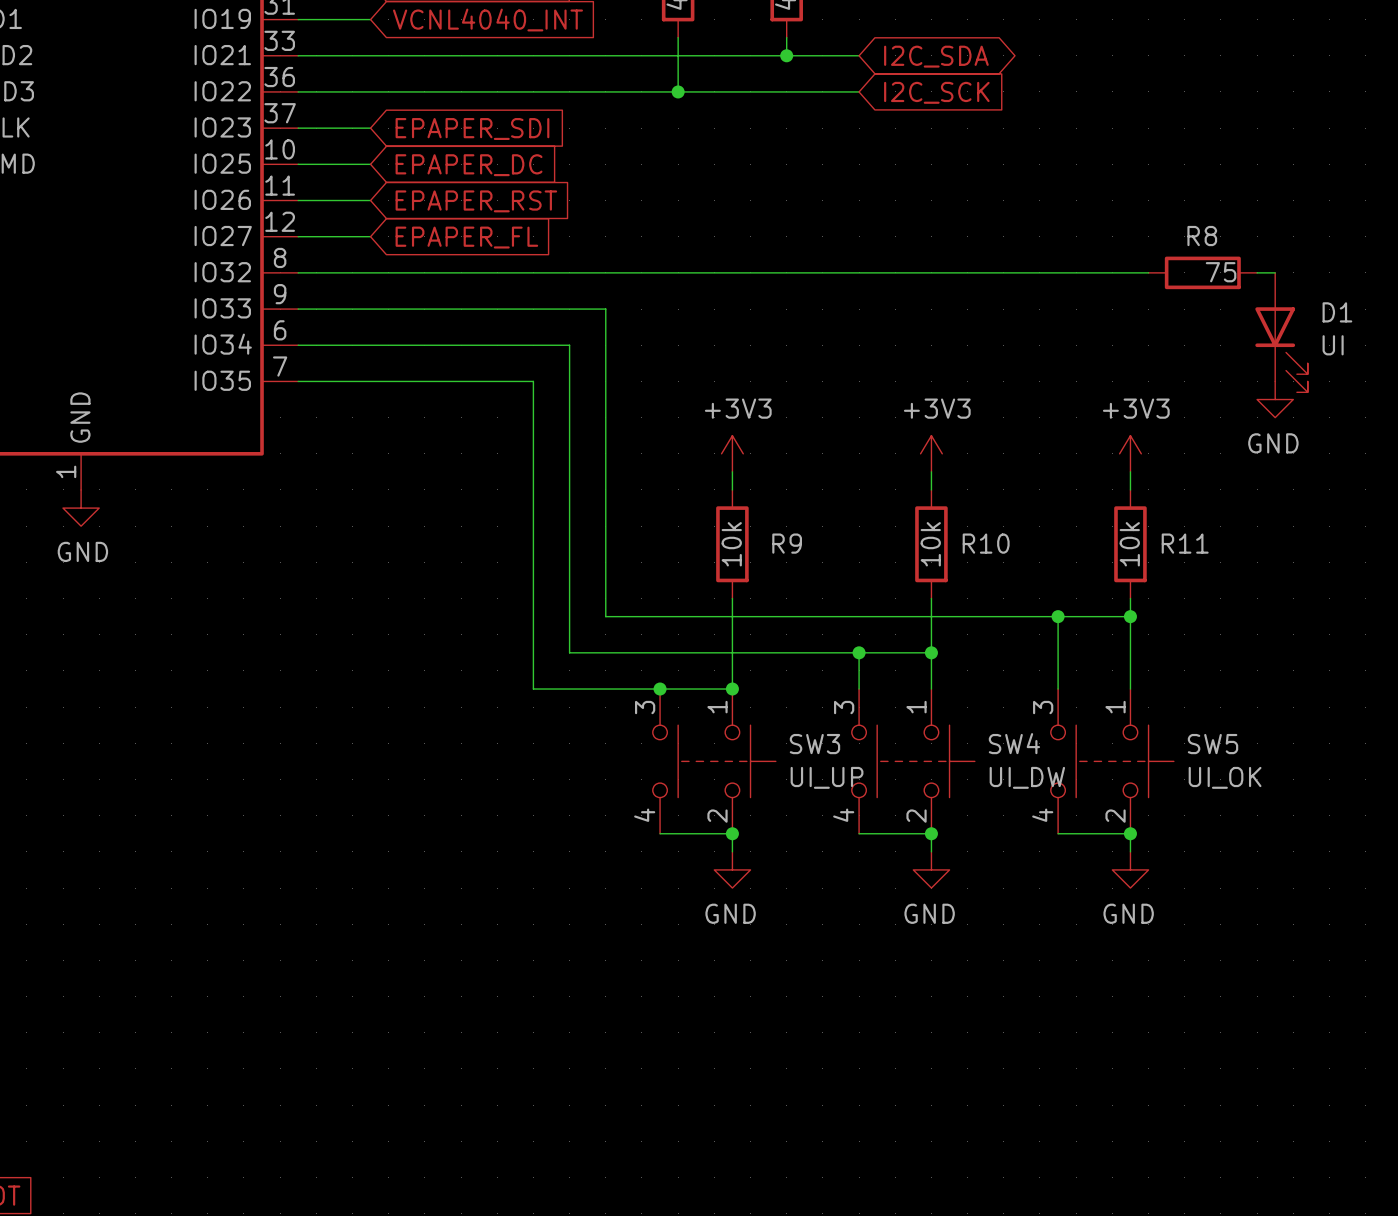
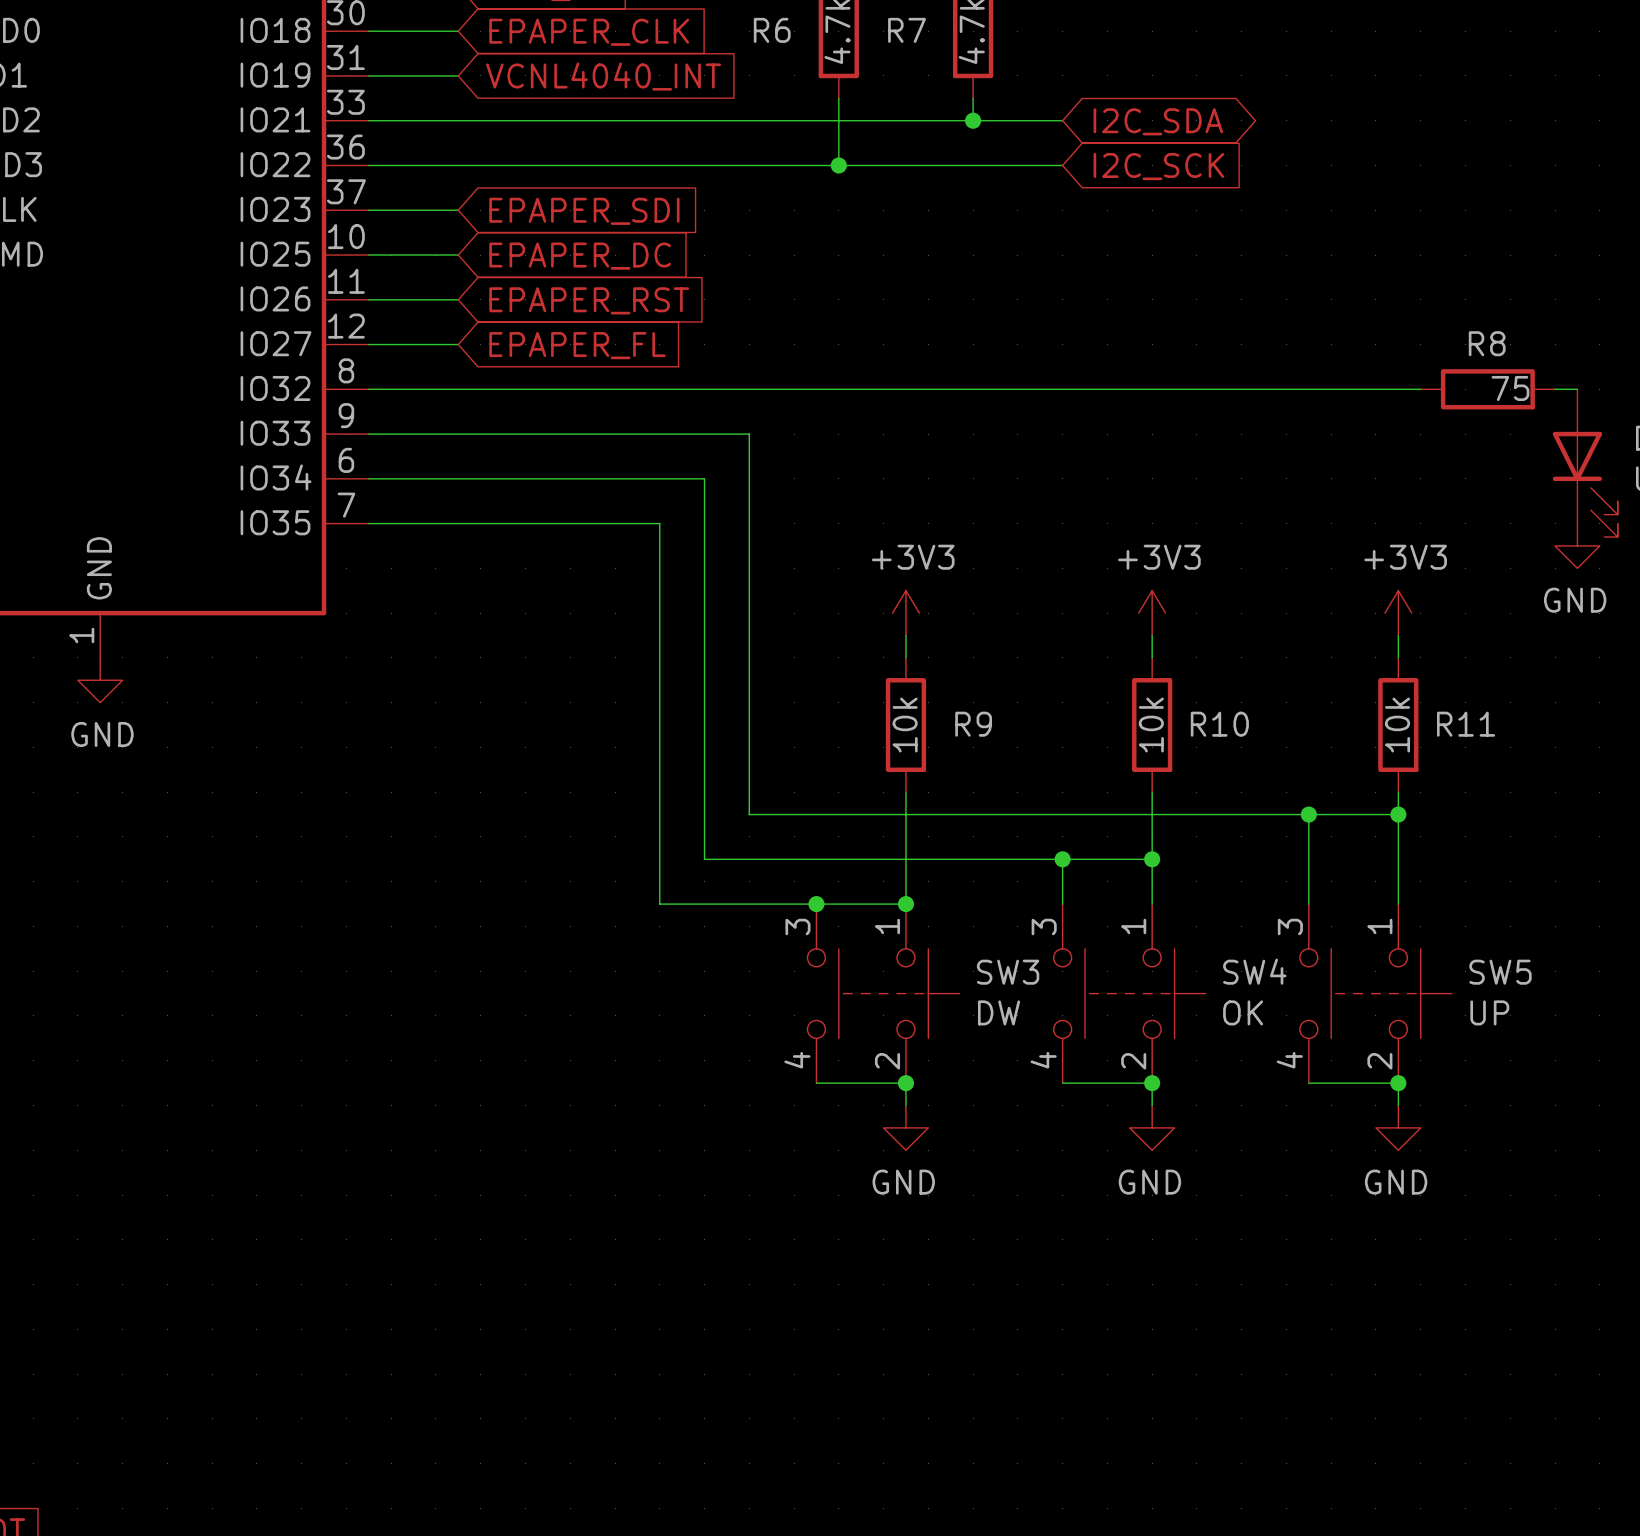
SW3 value: UI_UP (827, 777) -> DW (999, 1012)
SW4 value: UI_DW (1027, 777) -> OK (1243, 1012)
SW5 value: UI_OK (1225, 777) -> UP (1489, 1012)

